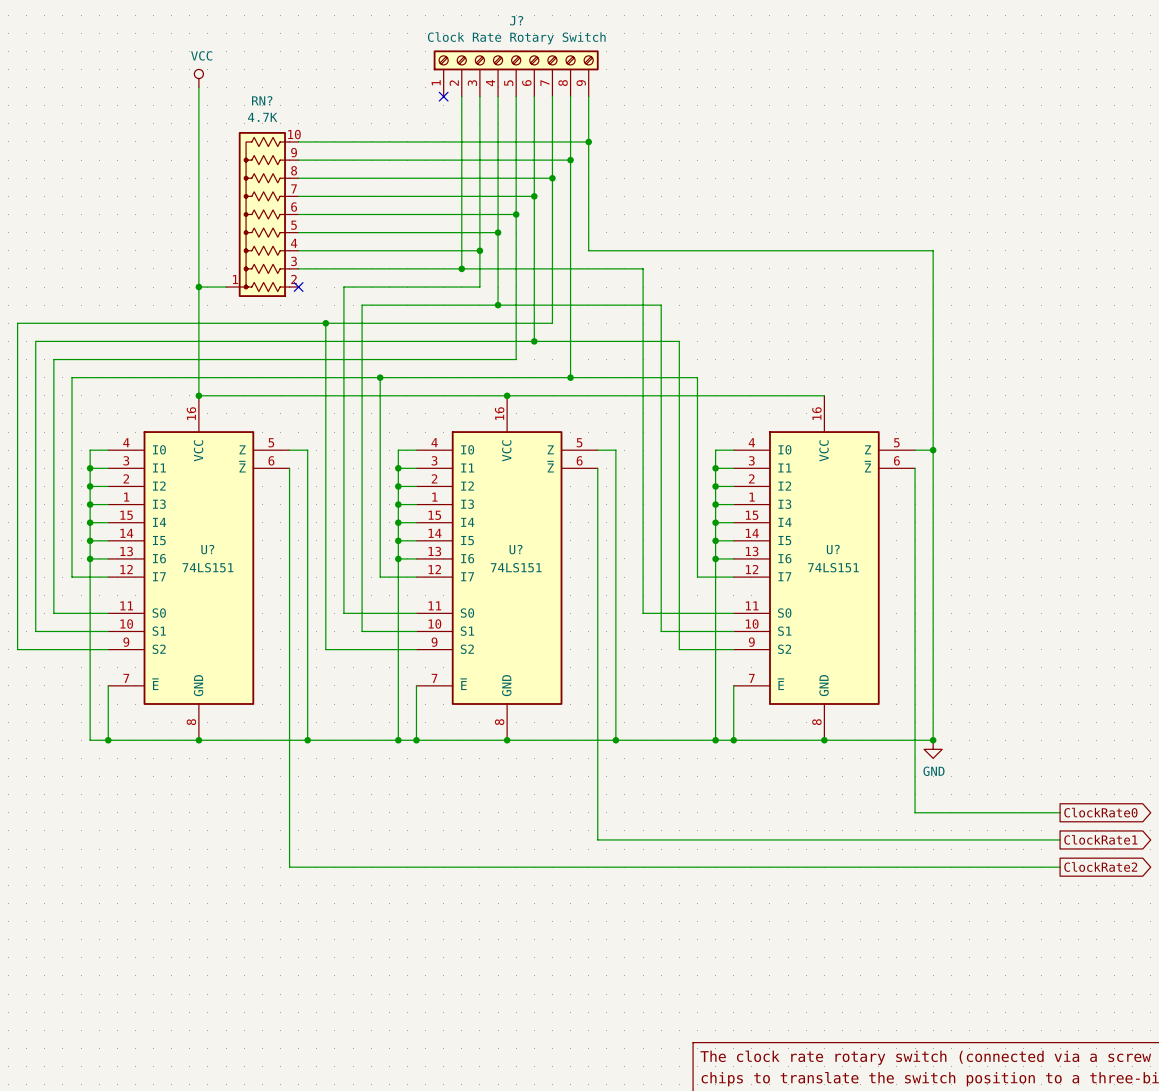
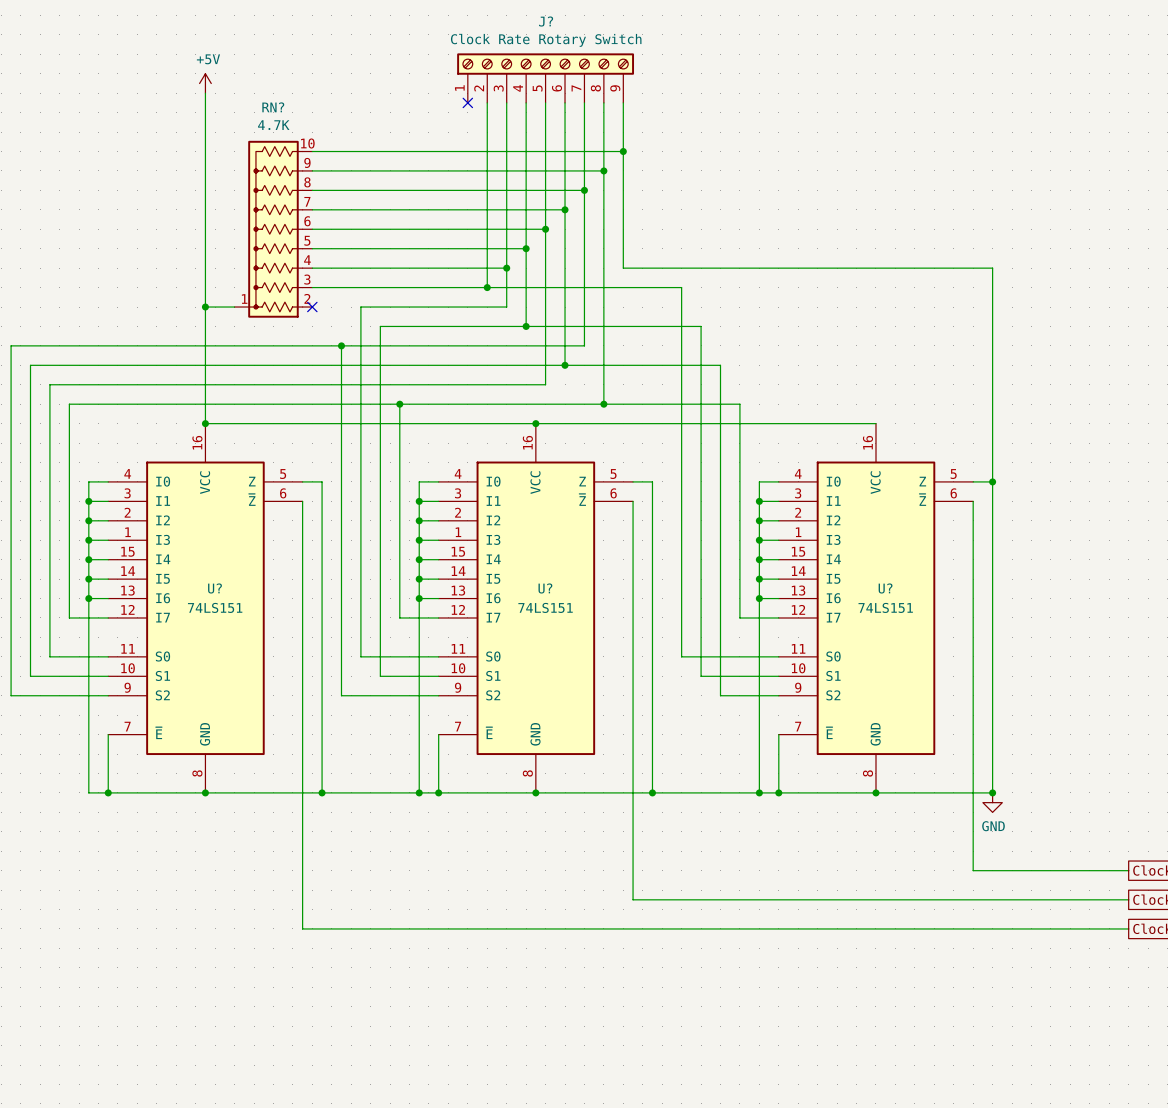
power symbol: VCC (198, 78) -> +5V (205, 83)

